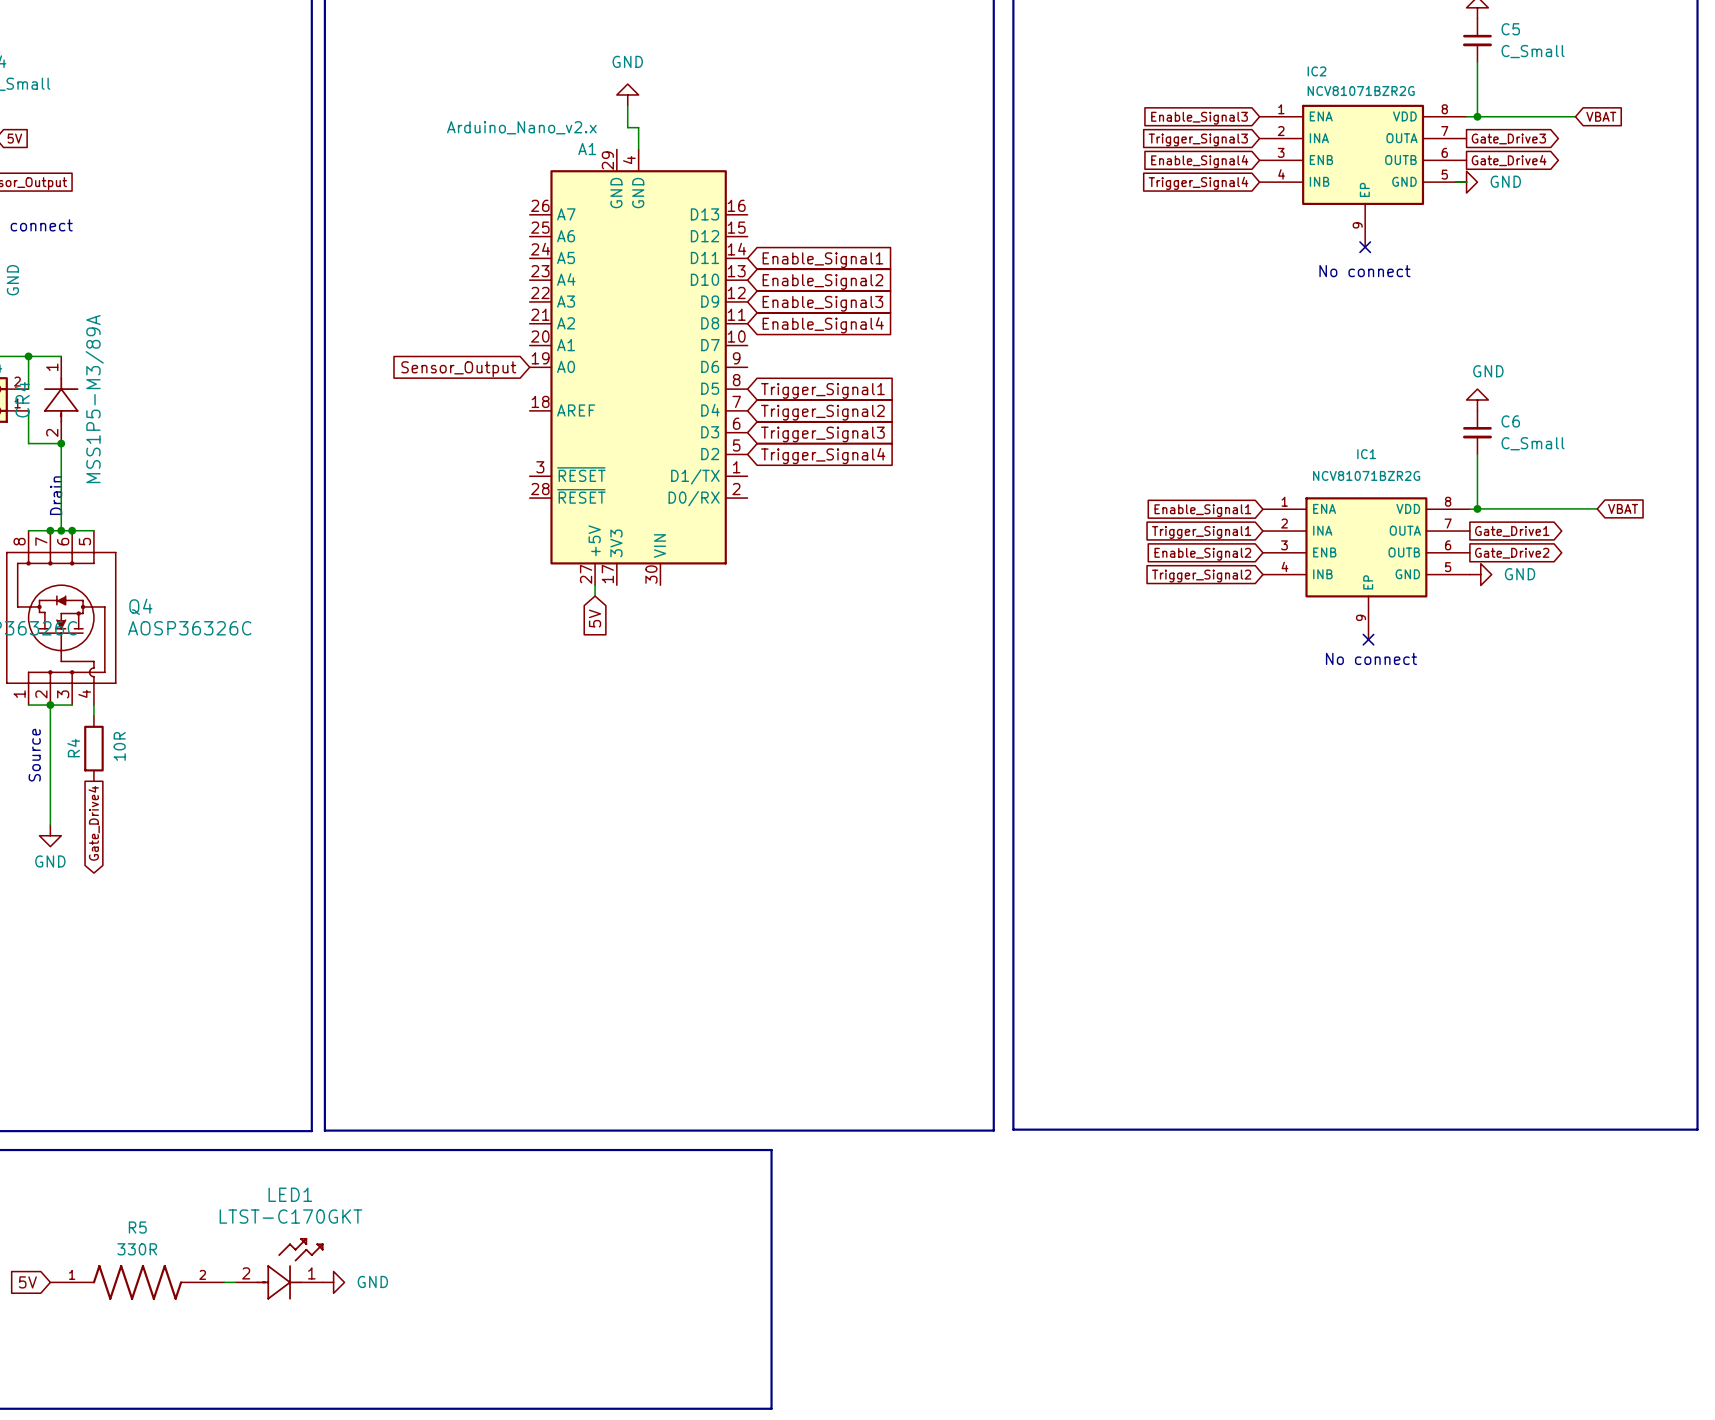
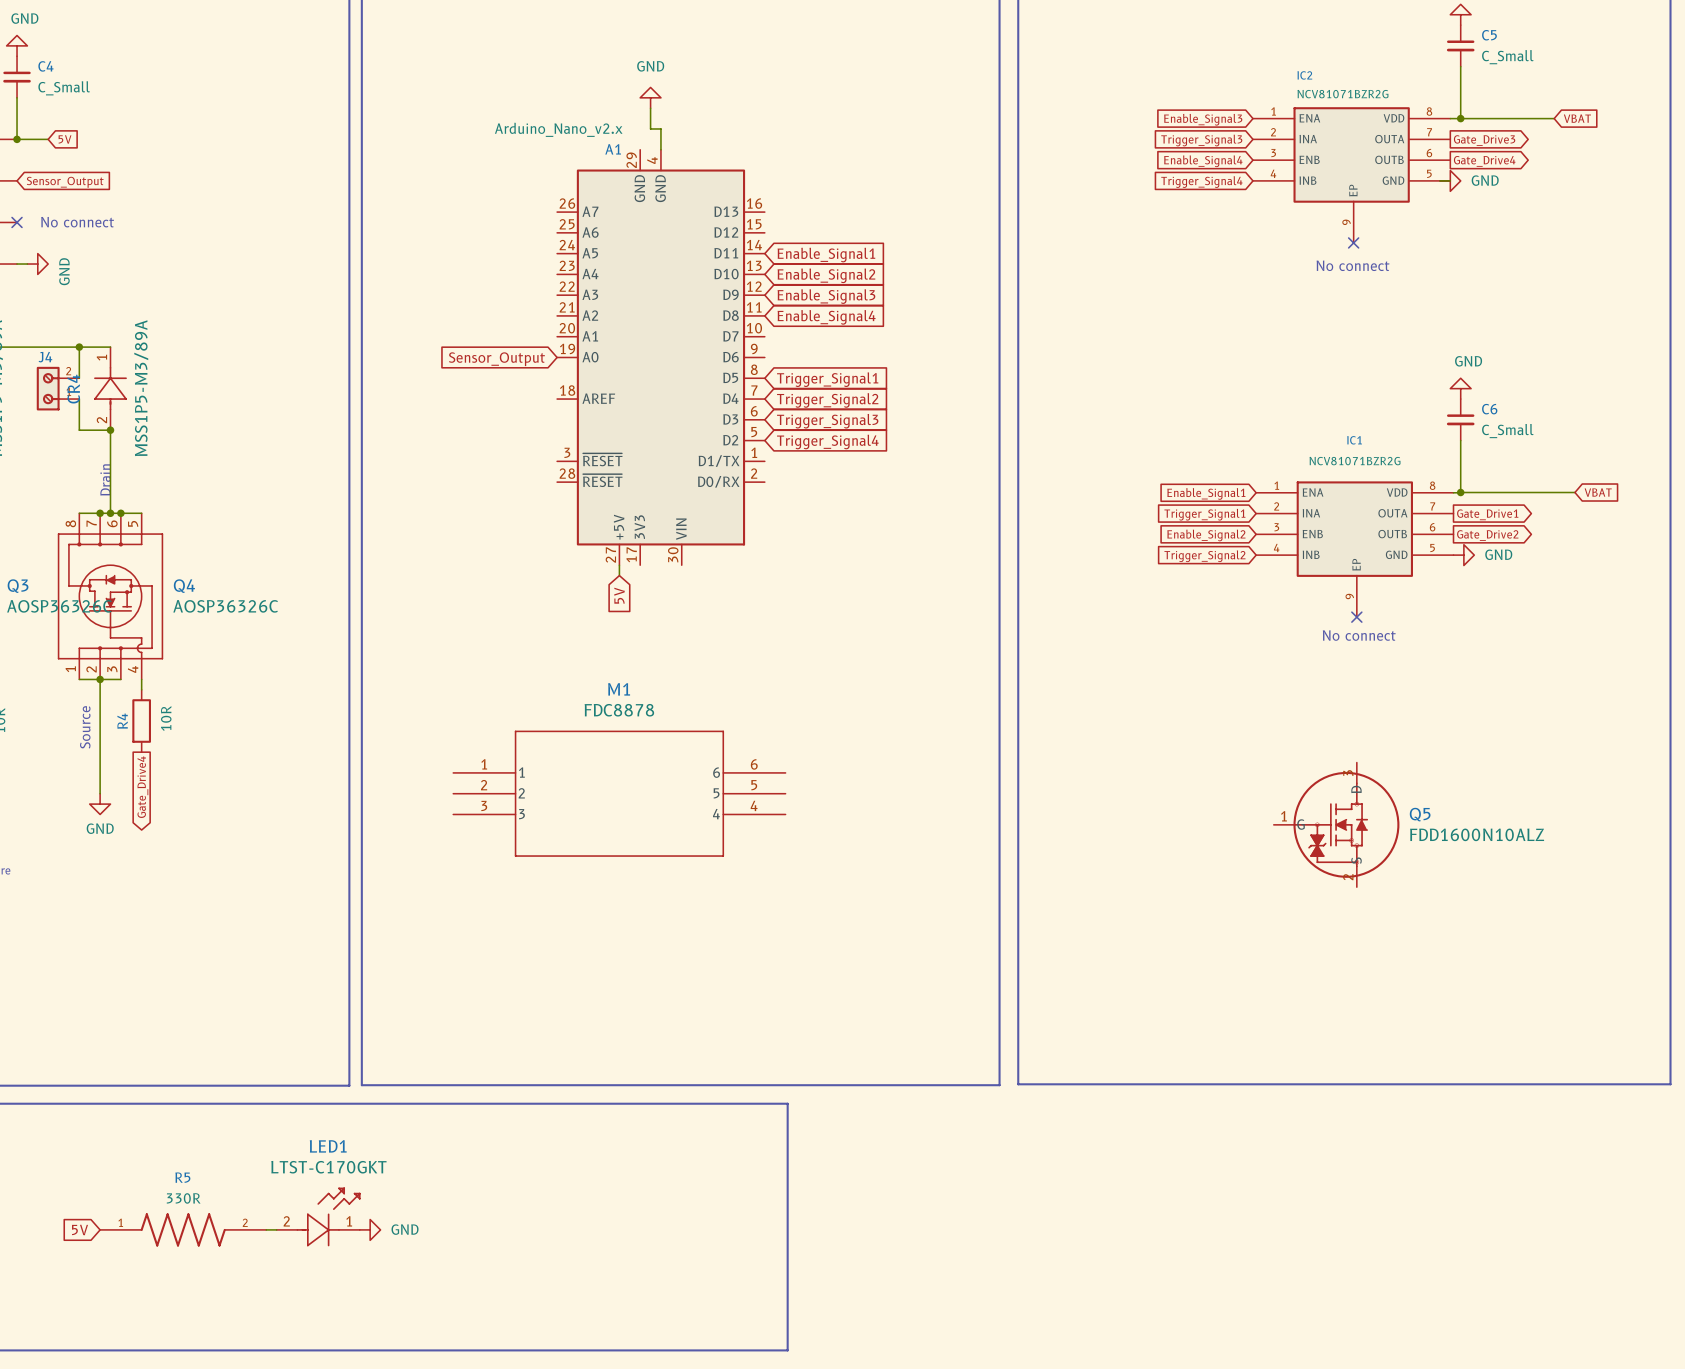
M1: none -> FDC8878 (619, 793)
Q5: none -> FDD1600N10ALZ (1336, 824)

